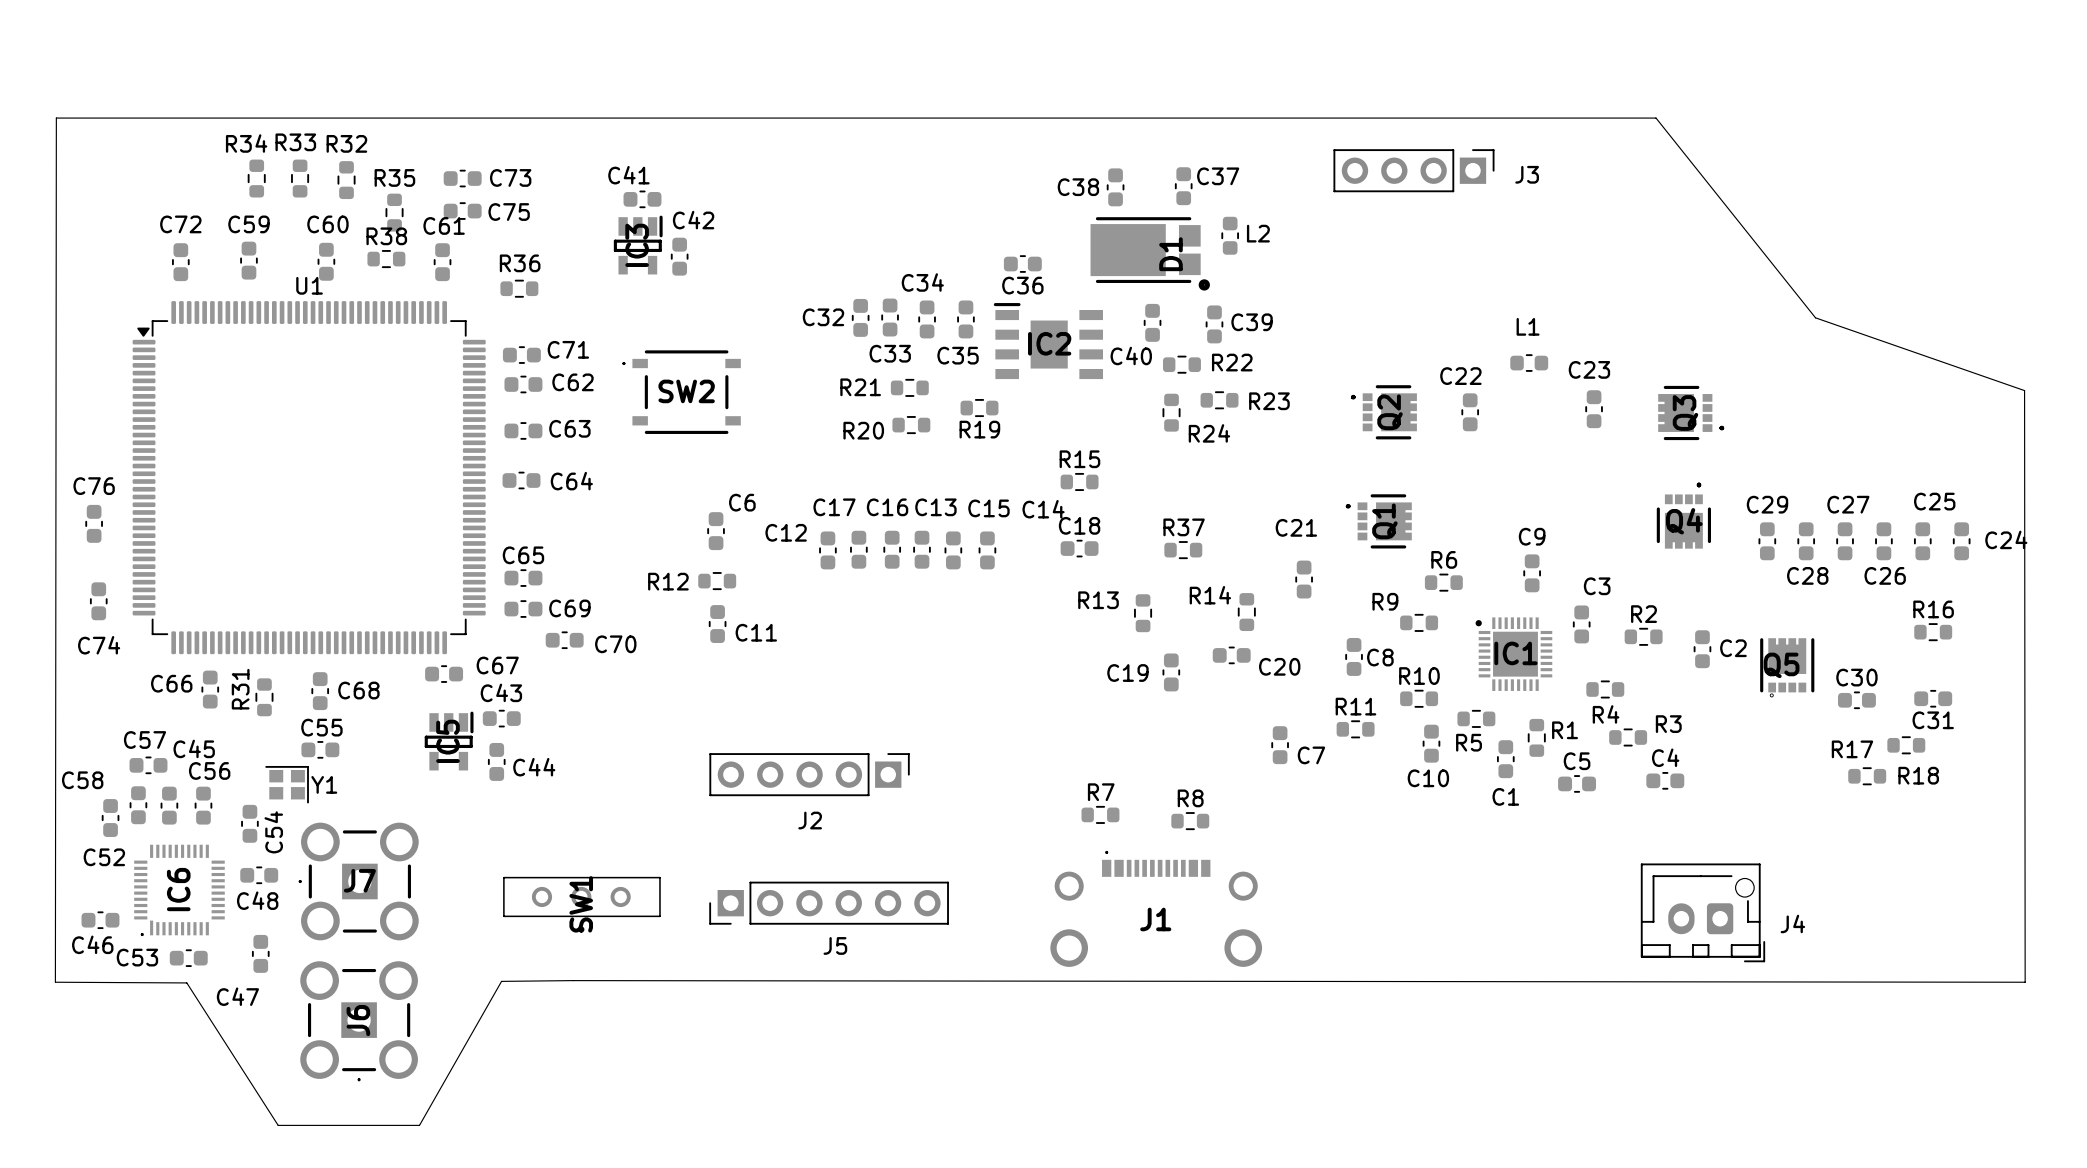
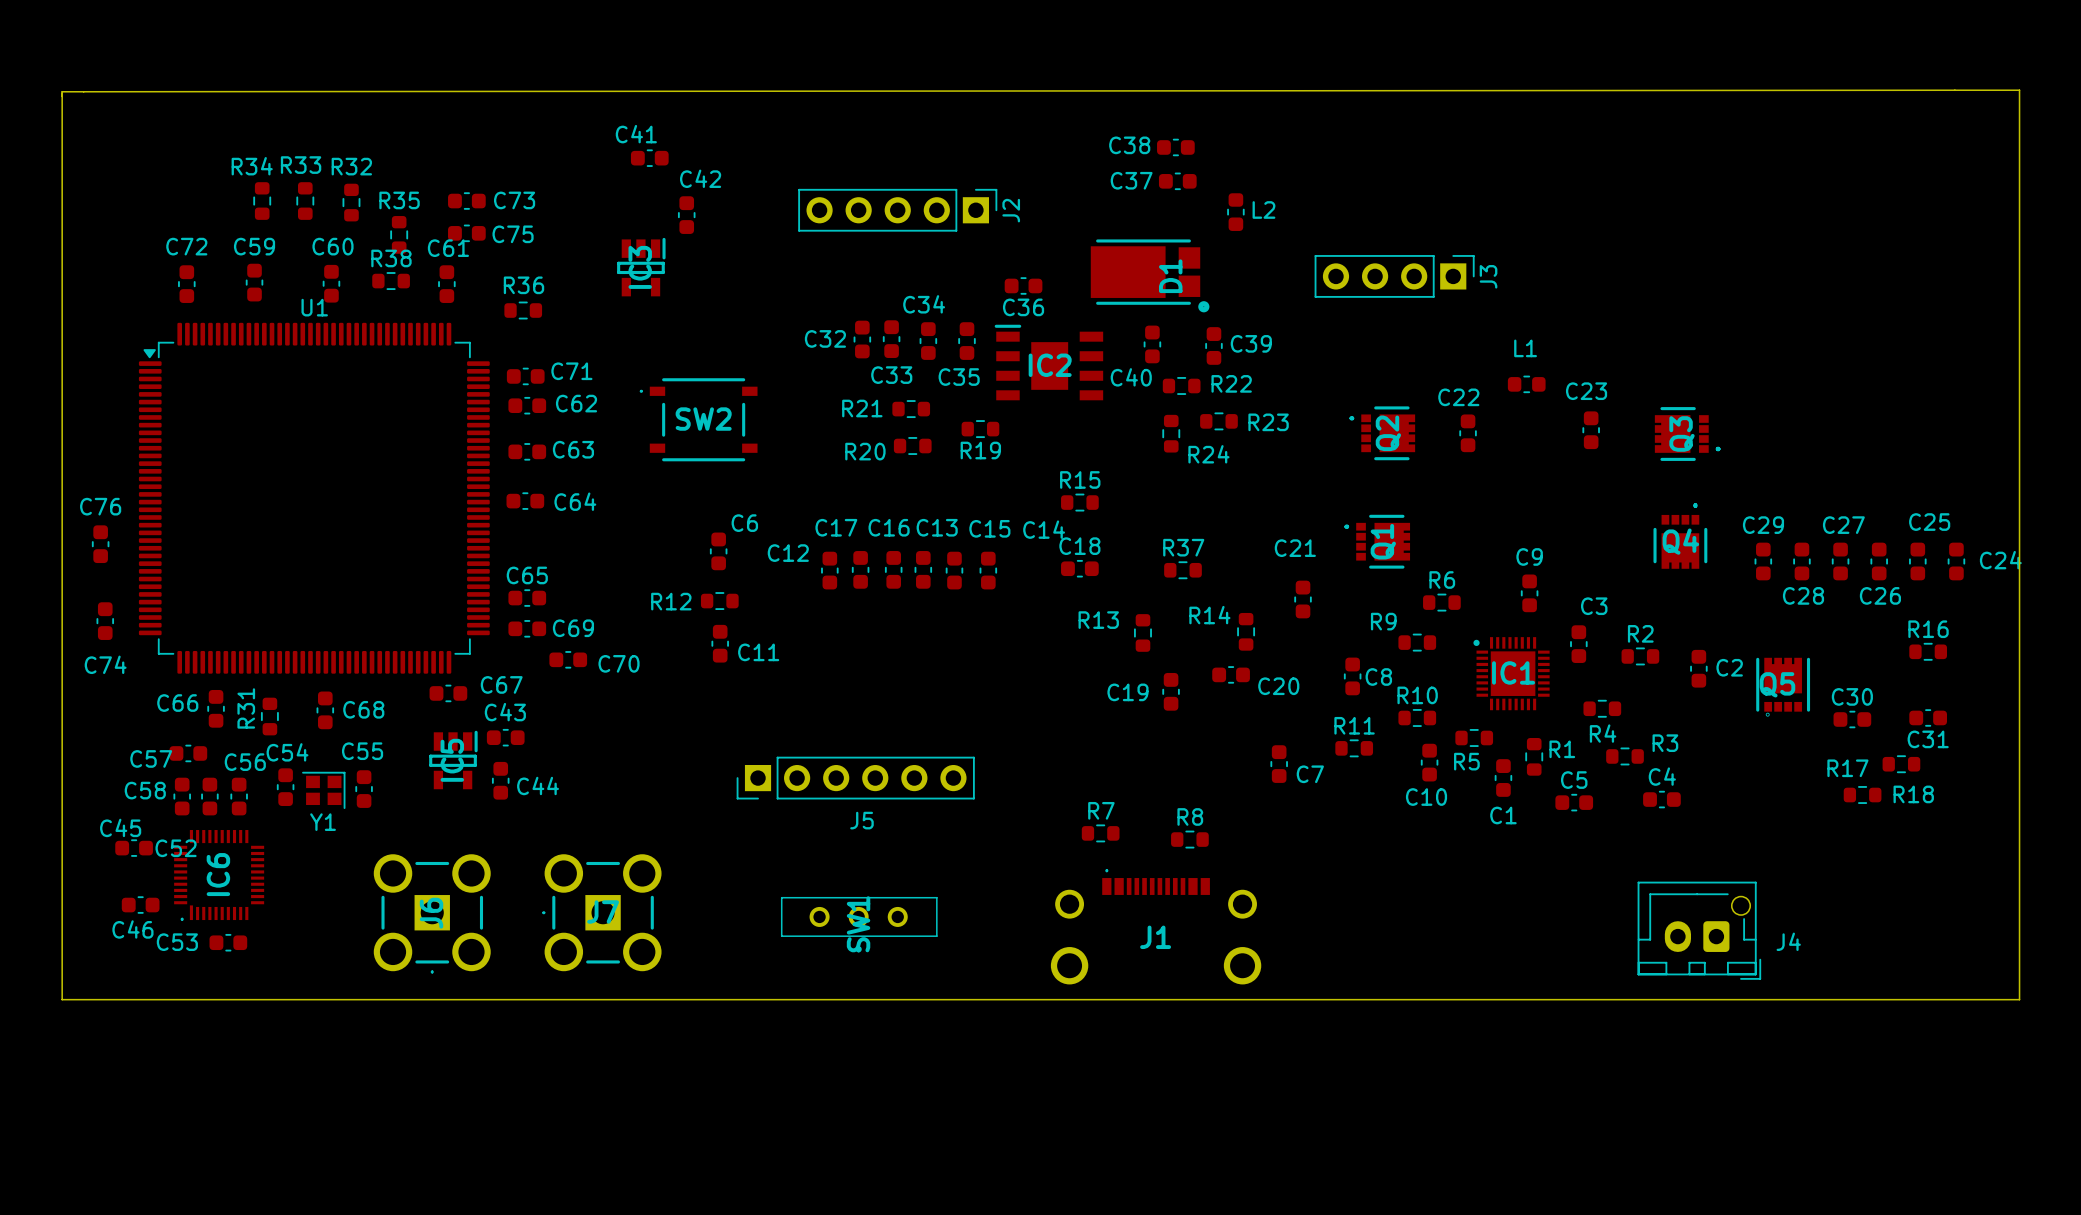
board edge: (56, 118) (55, 982) (186, 982) (278, 1125) (419, 1125) (501, 981) (2025, 982) (2024, 390) (1815, 317) (1656, 118) (56, 118) -> (1954, 90) (62, 91) (62, 999) (2019, 999) (2019, 90) (1954, 90)
J3 position: (1413, 170) -> (1394, 276)
J3 name rotation: 0° (1527, 174) -> 90° counterclockwise (1488, 276)
C37 name position: C37 (1218, 176) -> C37 (1131, 180)
C37 rotation: 0° (1183, 186) -> 90° clockwise (1177, 181)
C37 position: (1183, 186) -> (1177, 181)
C38 rotation: 0° (1115, 187) -> 90° clockwise (1175, 147)
C38 position: (1115, 187) -> (1175, 147)
C41 position: (642, 199) -> (649, 158)
L2 position: (1230, 235) -> (1235, 212)
C42 position: (679, 256) -> (686, 215)
SW2 position: (681, 392) -> (698, 419)
C45 name position: C45 (194, 748) -> C45 (120, 827)
C55 rotation: 0° (320, 749) -> 90° clockwise (364, 789)
C55 position: (320, 749) -> (364, 789)
C57 position: (148, 765) -> (188, 753)
J2 position: (809, 774) -> (897, 210)
C58 name position: C58 (82, 780) -> C58 (145, 790)
Y1 position: (287, 784) -> (323, 790)
Y1 name position: Y1 (324, 784) -> Y1 (323, 822)
C52 position: (138, 805) -> (209, 796)
C45 rotation: 0° (169, 805) -> 90° clockwise (134, 848)
C45 position: (169, 805) -> (134, 848)
C56 position: (203, 805) -> (239, 796)
C58 position: (110, 818) -> (182, 796)
J2 name rotation: 0° (810, 820) -> 90° counterclockwise (1011, 210)
J2 name position: J2 (810, 820) -> J2 (1011, 210)
C54 position: (249, 823) -> (285, 787)
C54 name rotation: 0° (273, 832) -> 90° clockwise (287, 752)
C48: (259, 875) -> none
J7 position: (358, 881) -> (601, 912)
IC6 position: (179, 890) -> (219, 875)
J5 position: (829, 903) -> (855, 778)
SW1 position: (581, 904) -> (859, 924)
C46 position: (100, 920) -> (140, 905)
C47: (260, 953) -> none
C53 position: (188, 958) -> (228, 942)
J6 position: (359, 1021) -> (432, 913)

